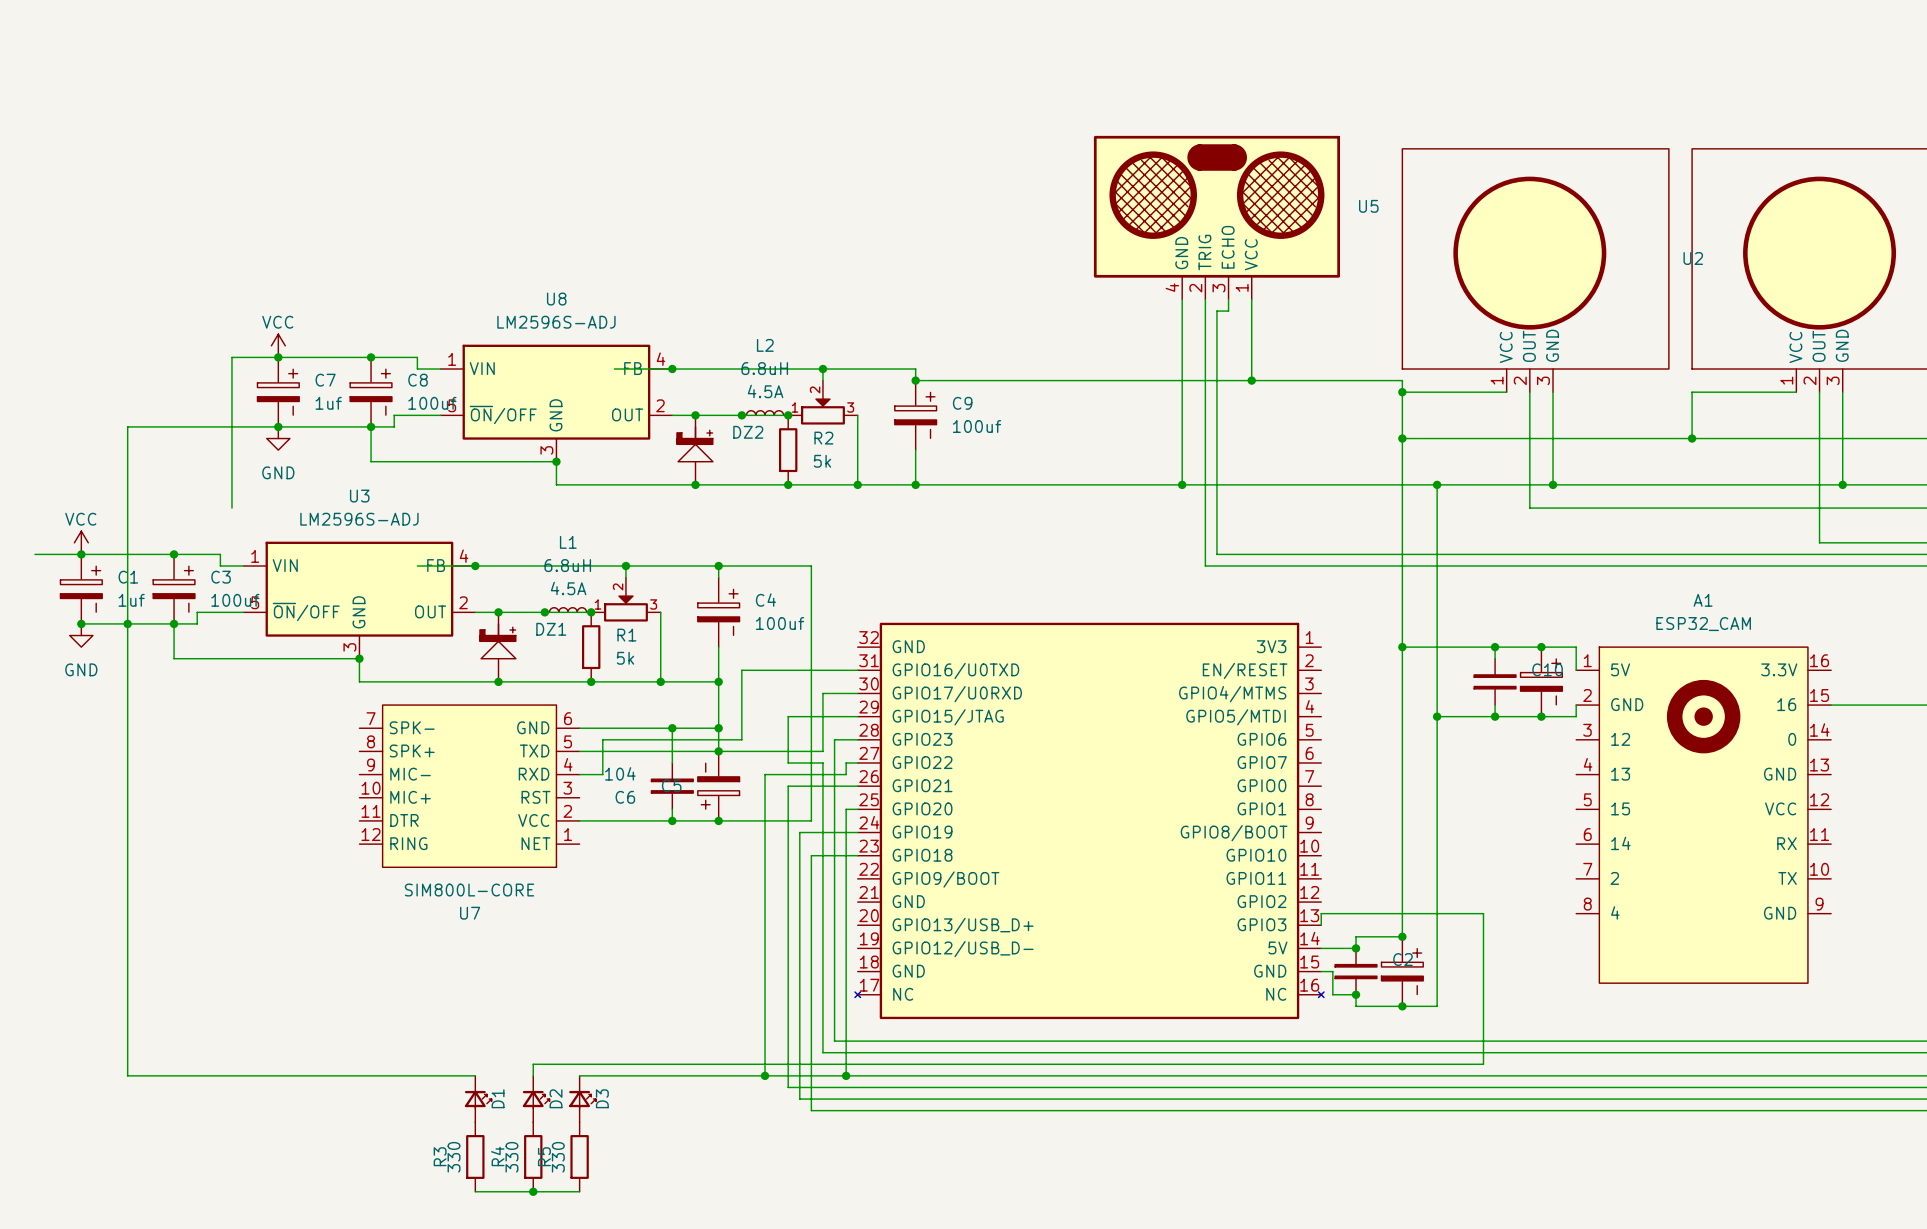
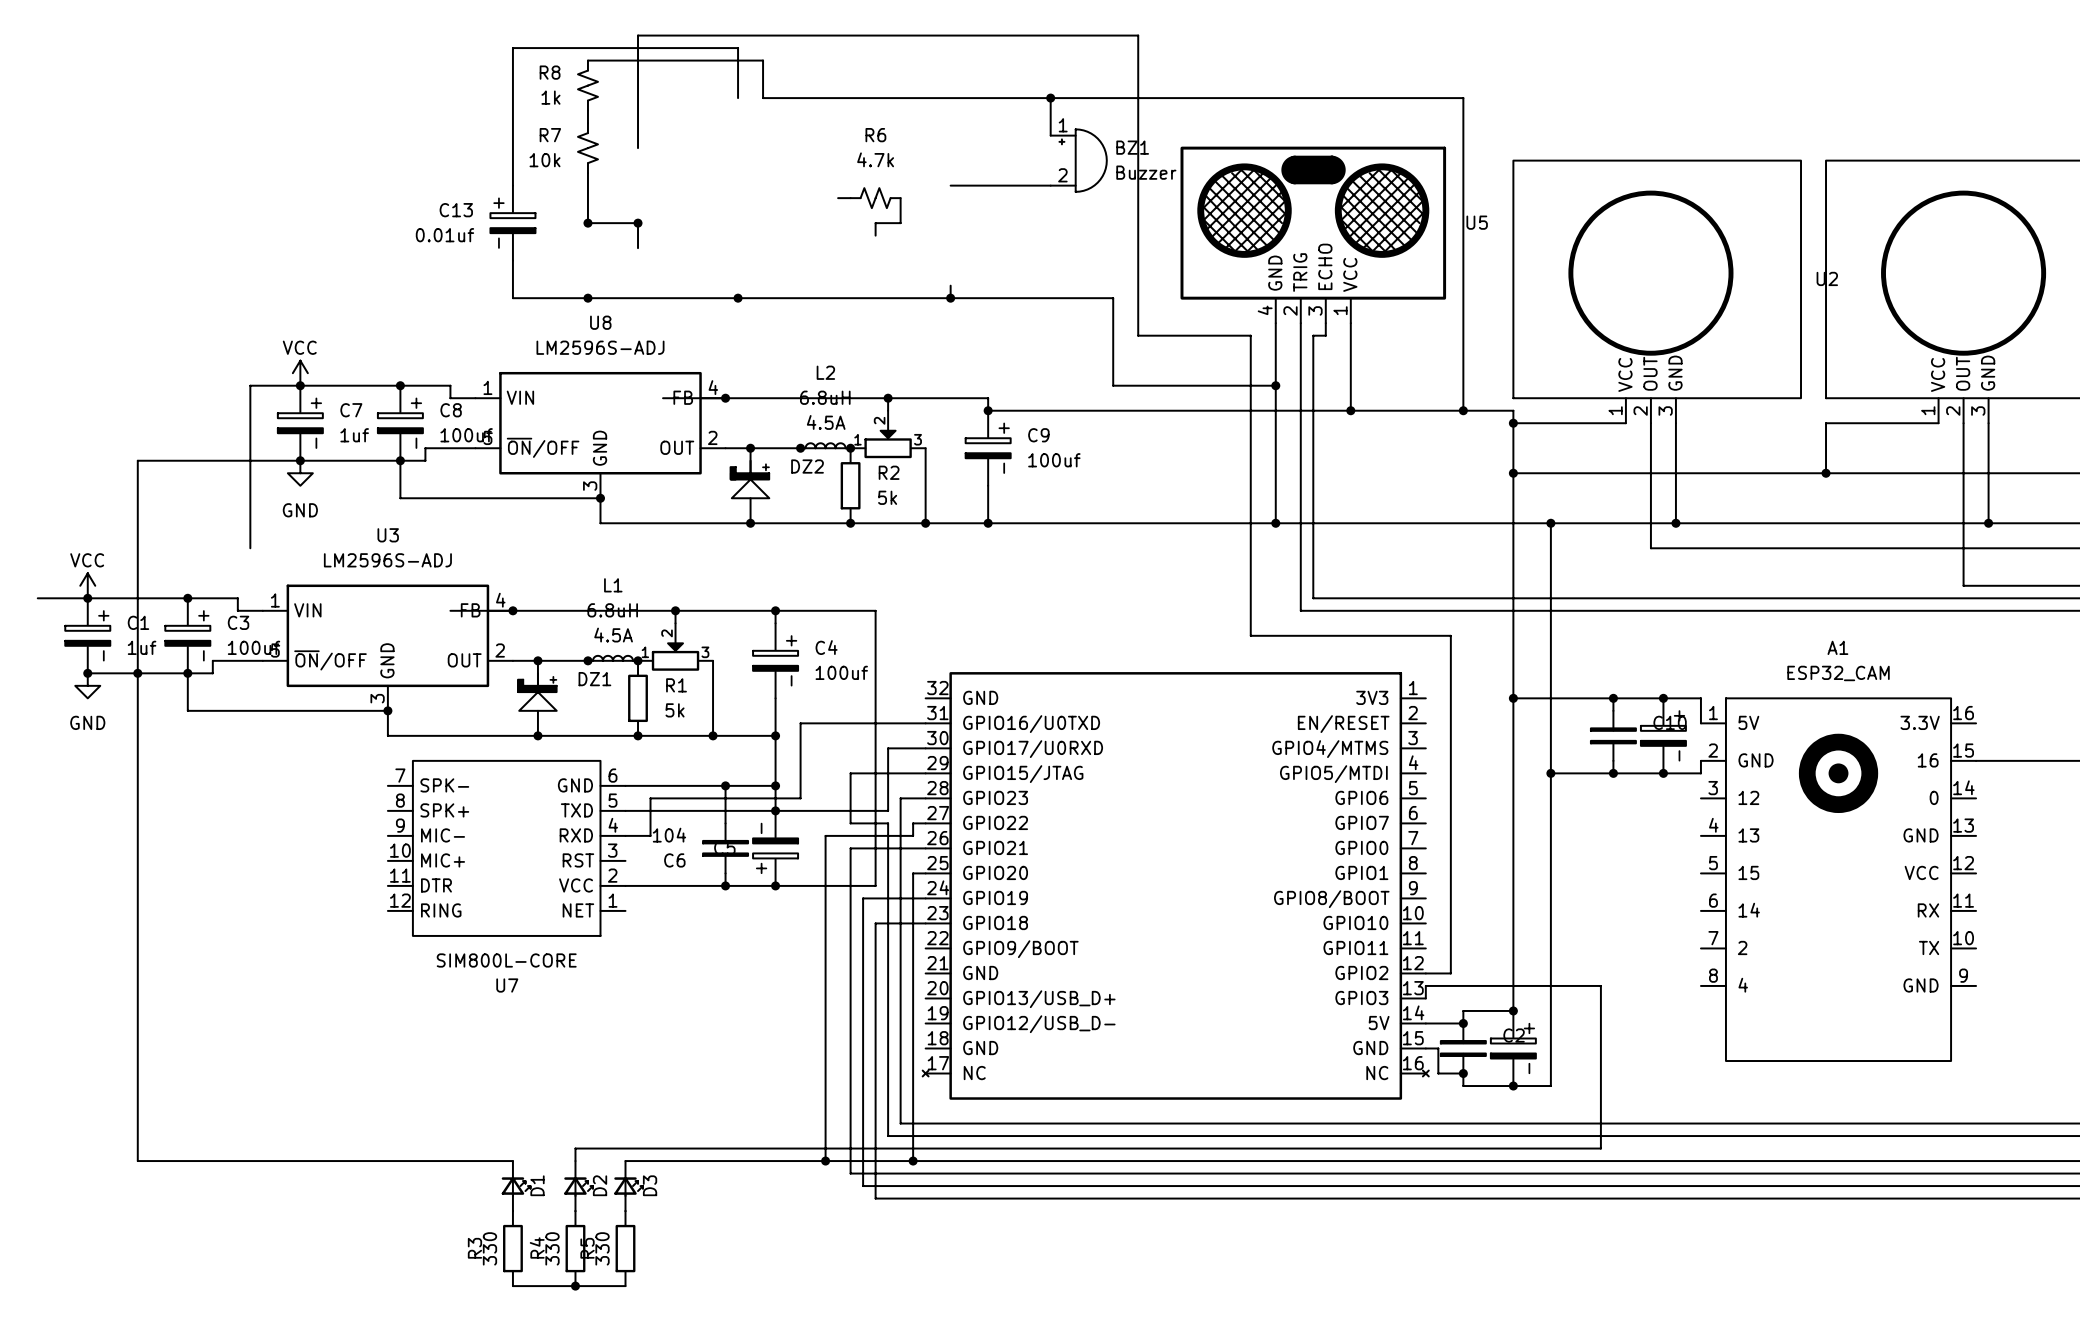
wire: none -> (587, 60) (763, 60) (763, 98) (1463, 98) (1463, 410)
R8: none -> 1k (587, 85)
wire: none -> (738, 98) (738, 48) (512, 48) (512, 185)
wire: none -> (1050, 98) (1050, 135)
junction: none -> (1050, 98)
wire: none -> (587, 110) (587, 123)
R7: none -> 10k (587, 148)
wire: none -> (638, 148) (638, 35) (1138, 35) (1138, 335) (1250, 335) (1250, 635) (1450, 635) (1450, 973) (1425, 973)
BZ1: none -> Buzzer (1078, 160)
wire: none -> (587, 173) (587, 223) (638, 223) (638, 248)
wire: none -> (950, 185) (1050, 185)
wire: none -> (838, 198) (850, 198)
R6: none -> 4.7k (875, 198)
wire: none -> (900, 198) (900, 223) (875, 223) (875, 235)
C13: none -> 0.01uf (512, 223)
junction: none -> (587, 223)
junction: none -> (638, 223)
wire: none -> (512, 260) (512, 298) (1113, 298) (1113, 385) (1275, 385)
wire: none -> (950, 285) (950, 298)
junction: none -> (587, 298)
junction: none -> (738, 298)
junction: none -> (950, 298)
junction: none -> (1275, 385)
junction: none -> (1463, 410)

